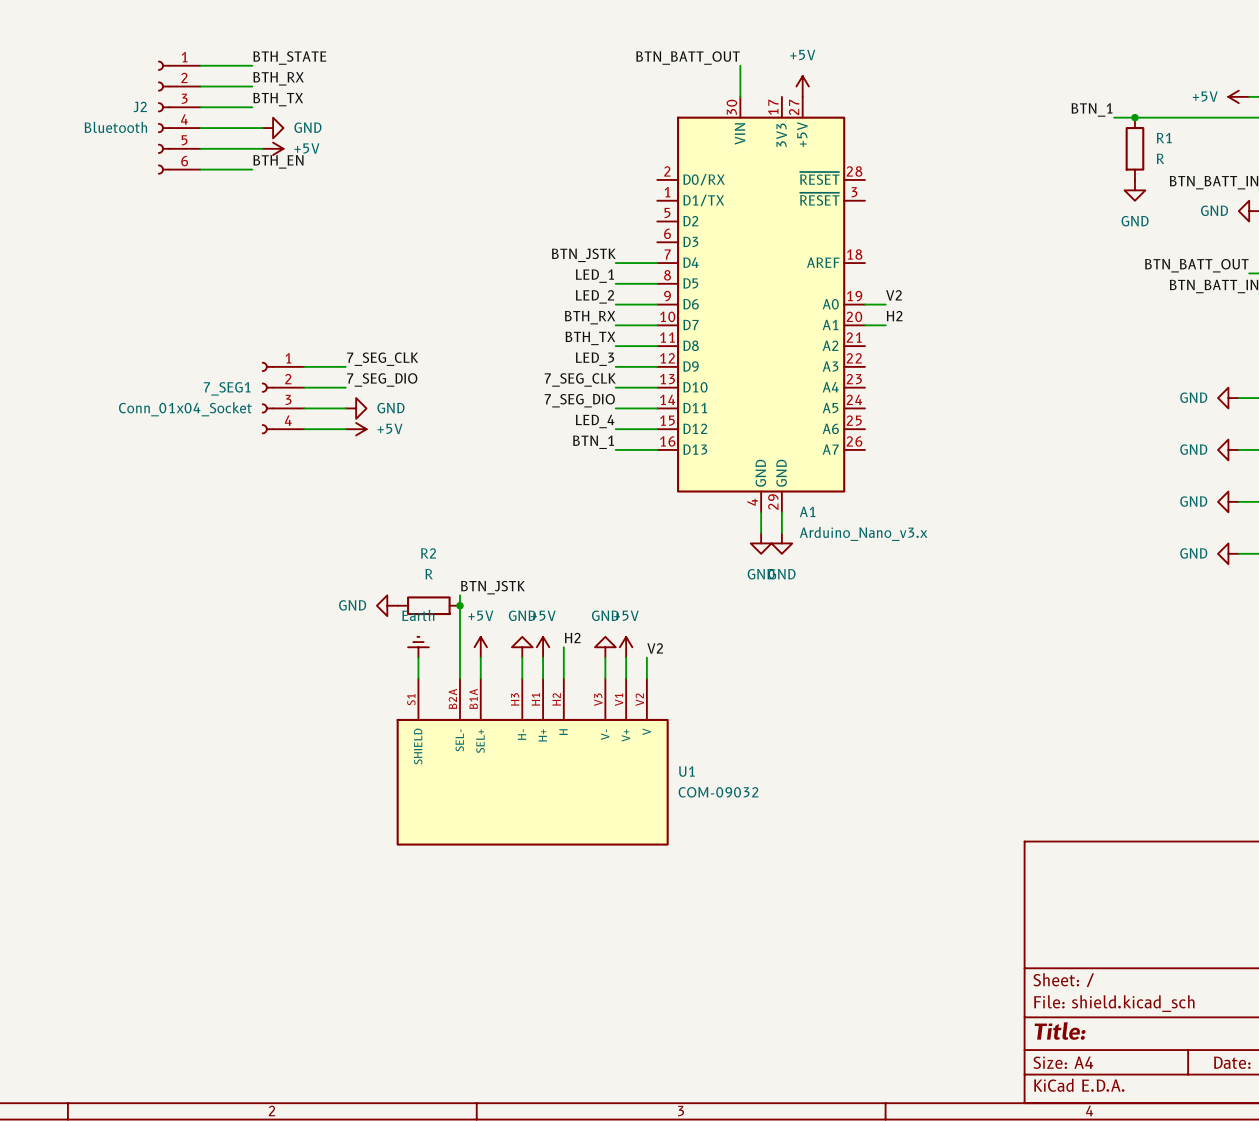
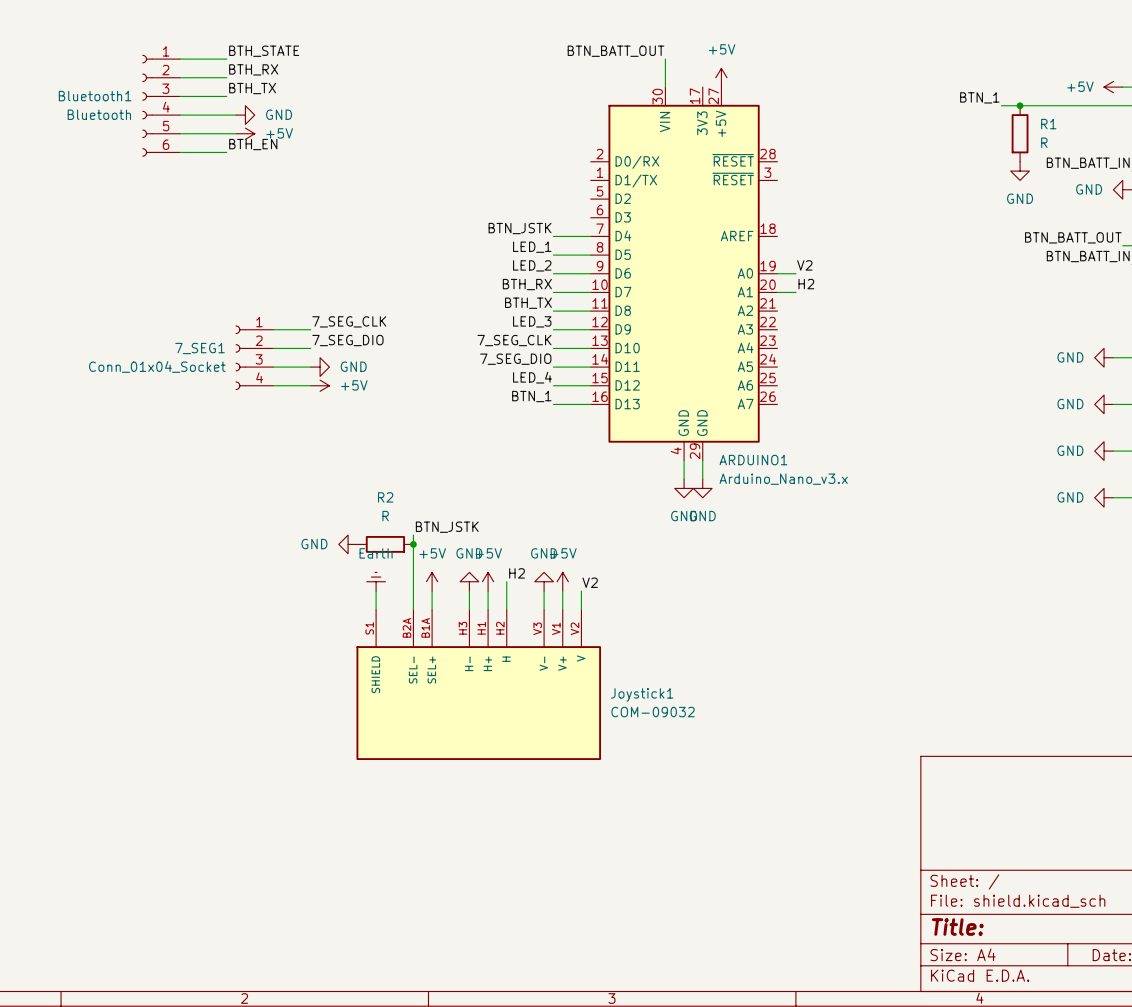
J2 name: J2 (140, 106) -> Bluetooth1 (95, 96)
A1 name: A1 (807, 511) -> ARDUINO1 (753, 460)
U1 name: U1 (686, 771) -> Joystick1 (642, 694)

